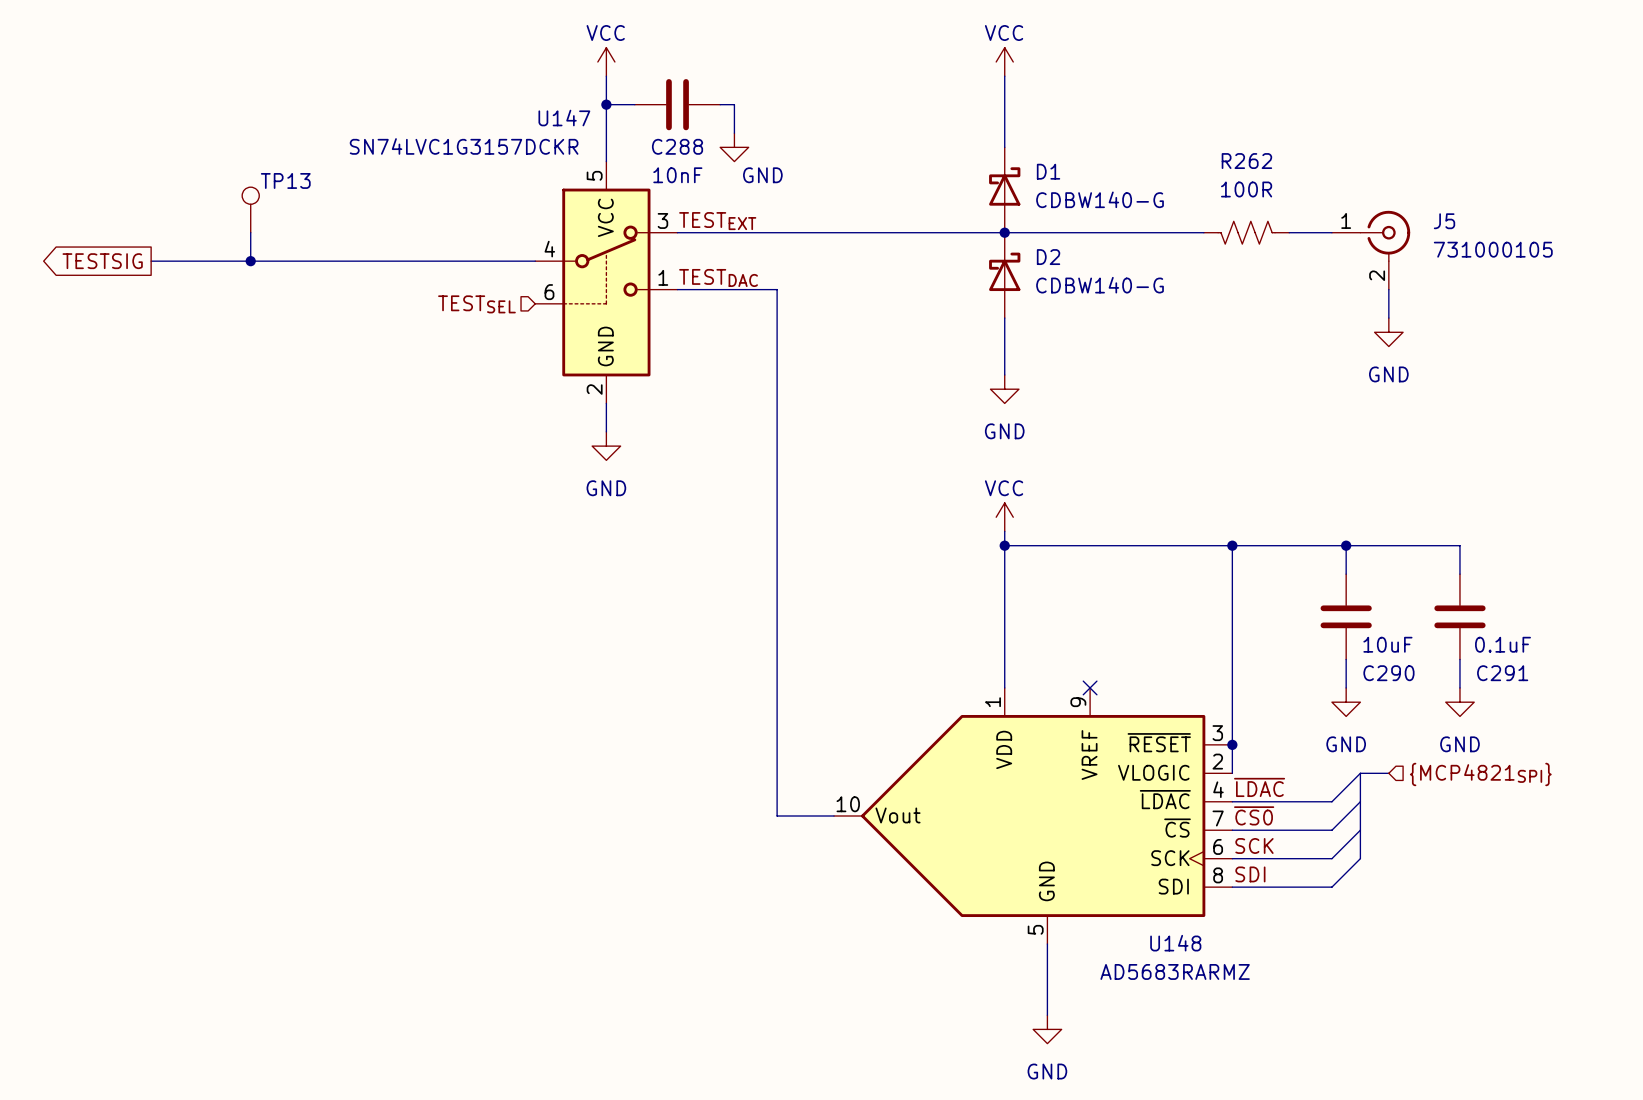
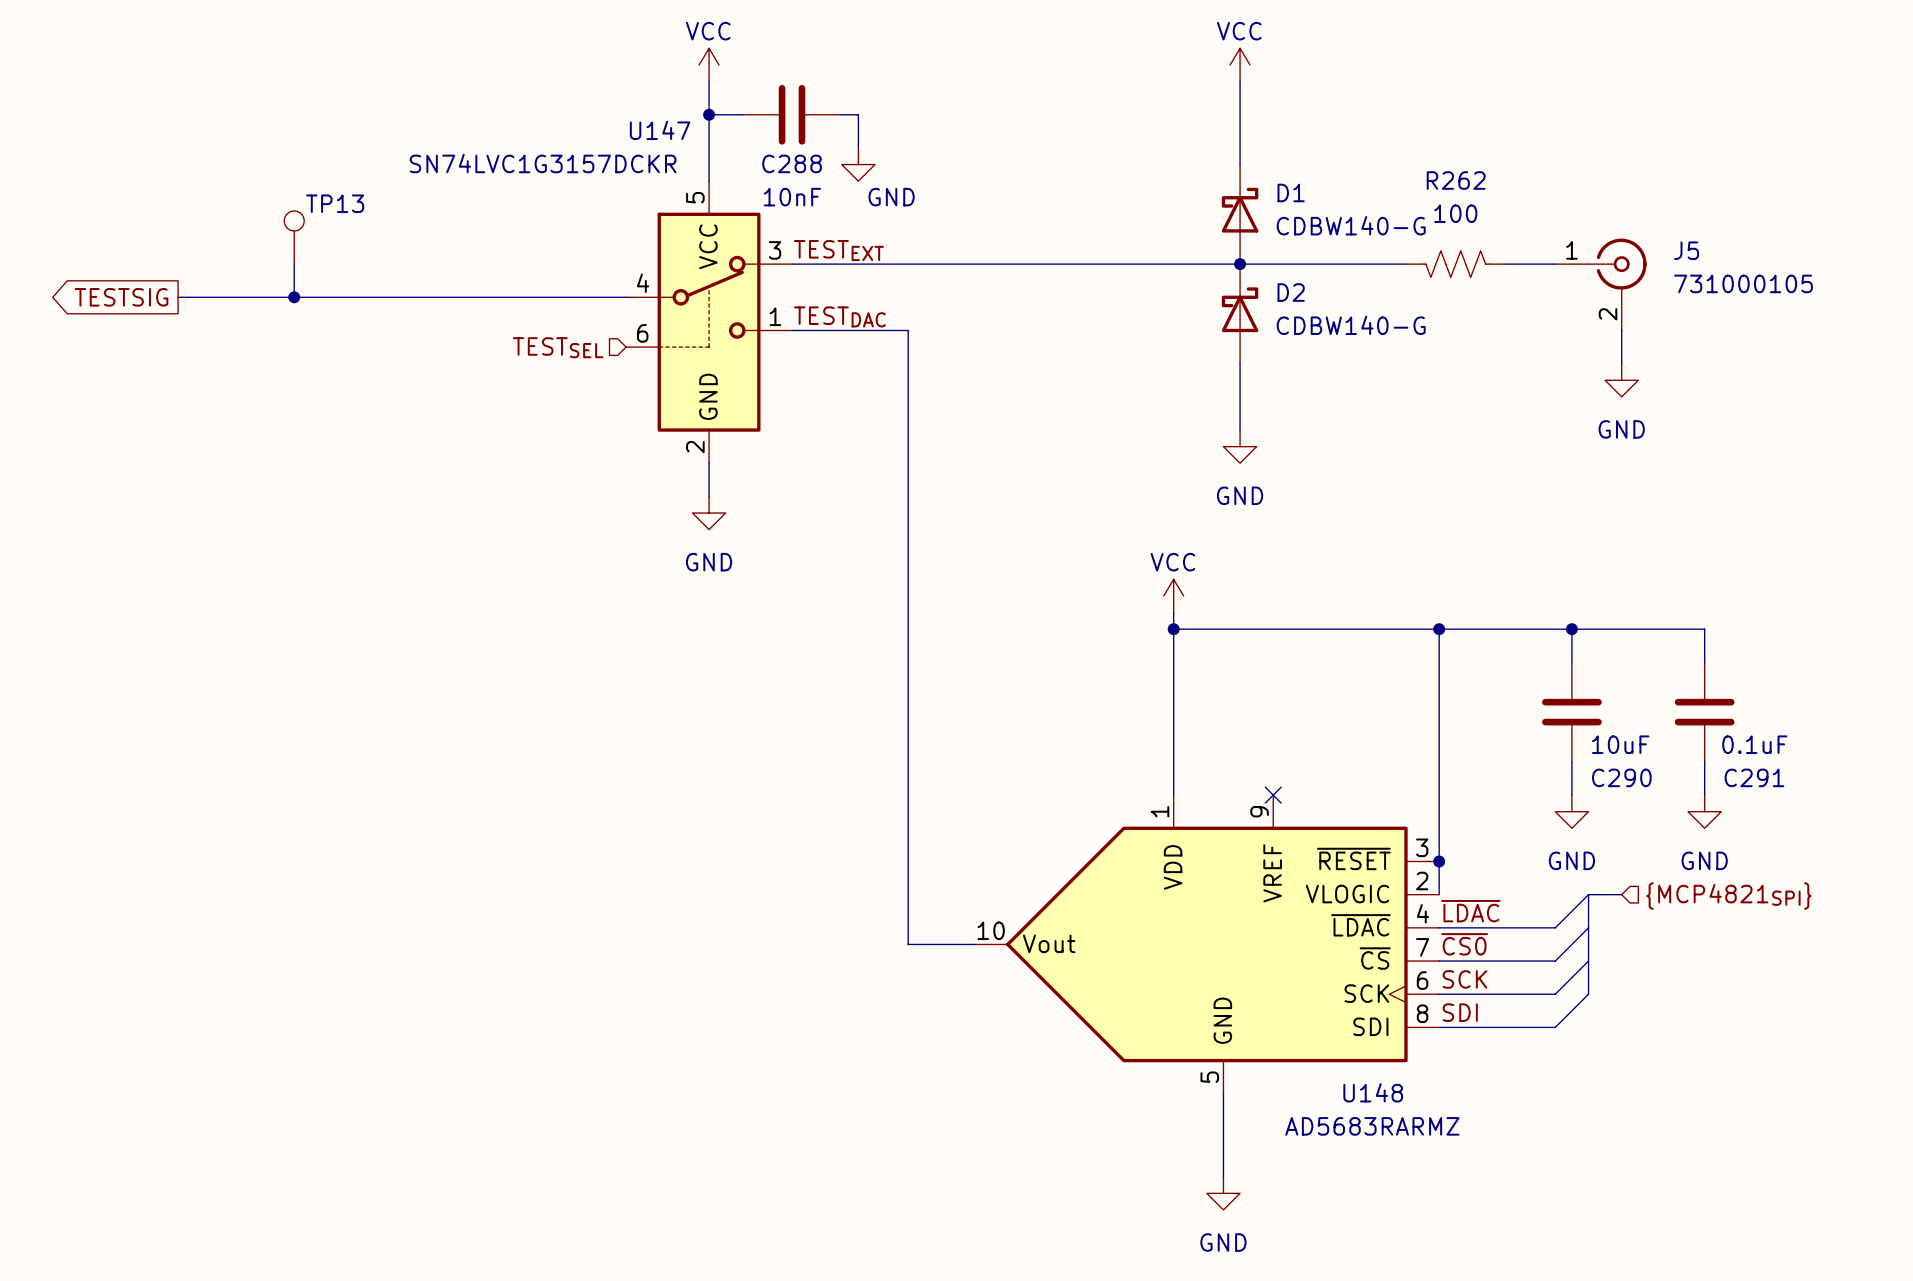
power symbol position: VCC (1004, 61) -> VCC (1240, 64)
wire: (1004, 76) (1004, 147) -> (1240, 81) (1240, 164)
R262 value: 100R (1246, 189) -> 100 (1455, 213)
D1 position: (1004, 190) -> (1240, 214)
junction position: (1004, 232) -> (1240, 264)
D2 position: (1004, 275) -> (1240, 313)
wire: (1004, 318) (1004, 374) -> (1240, 363) (1240, 430)
power symbol position: GND (1004, 389) -> GND (1240, 446)

